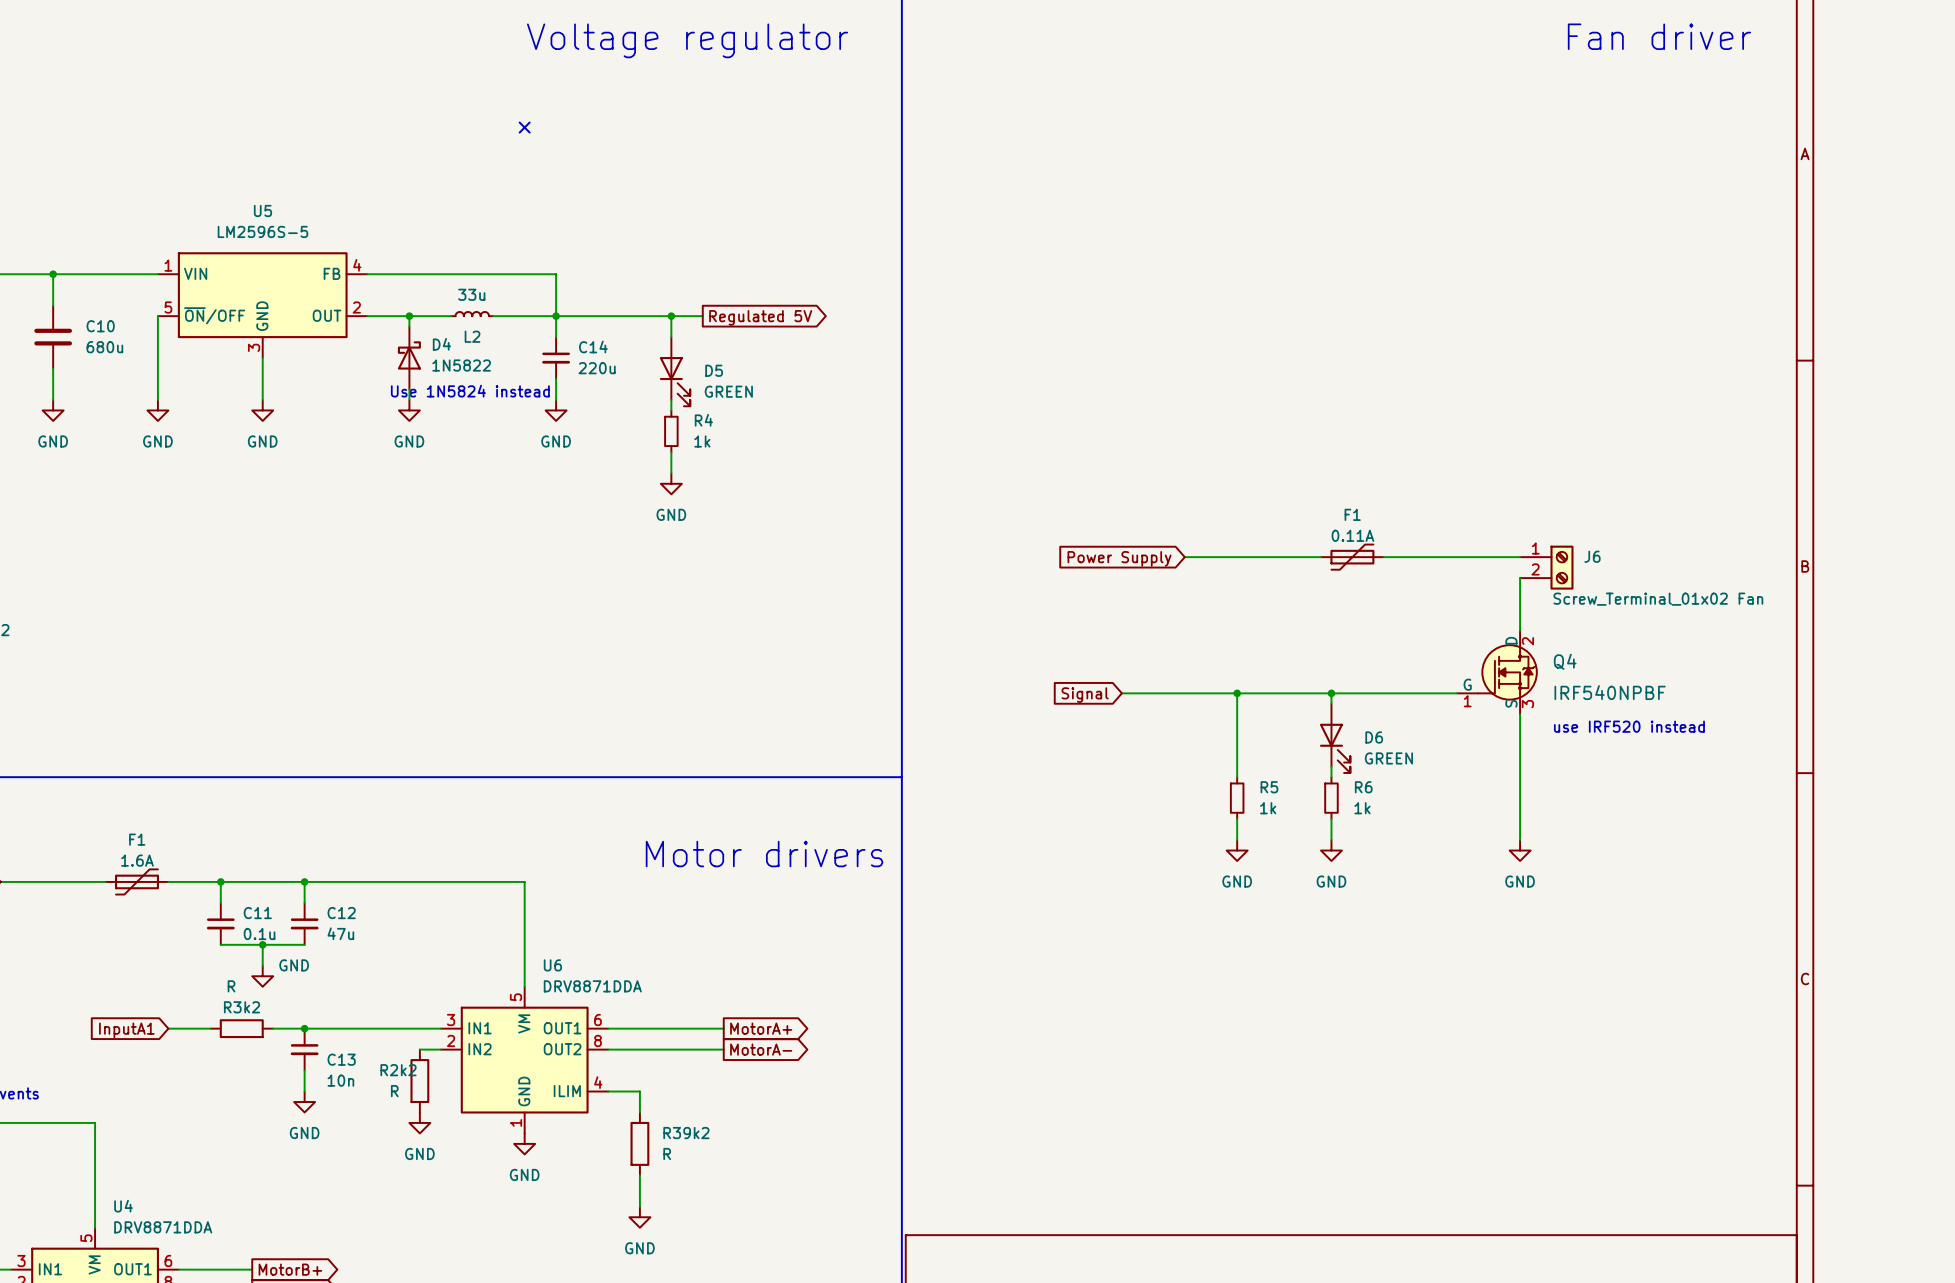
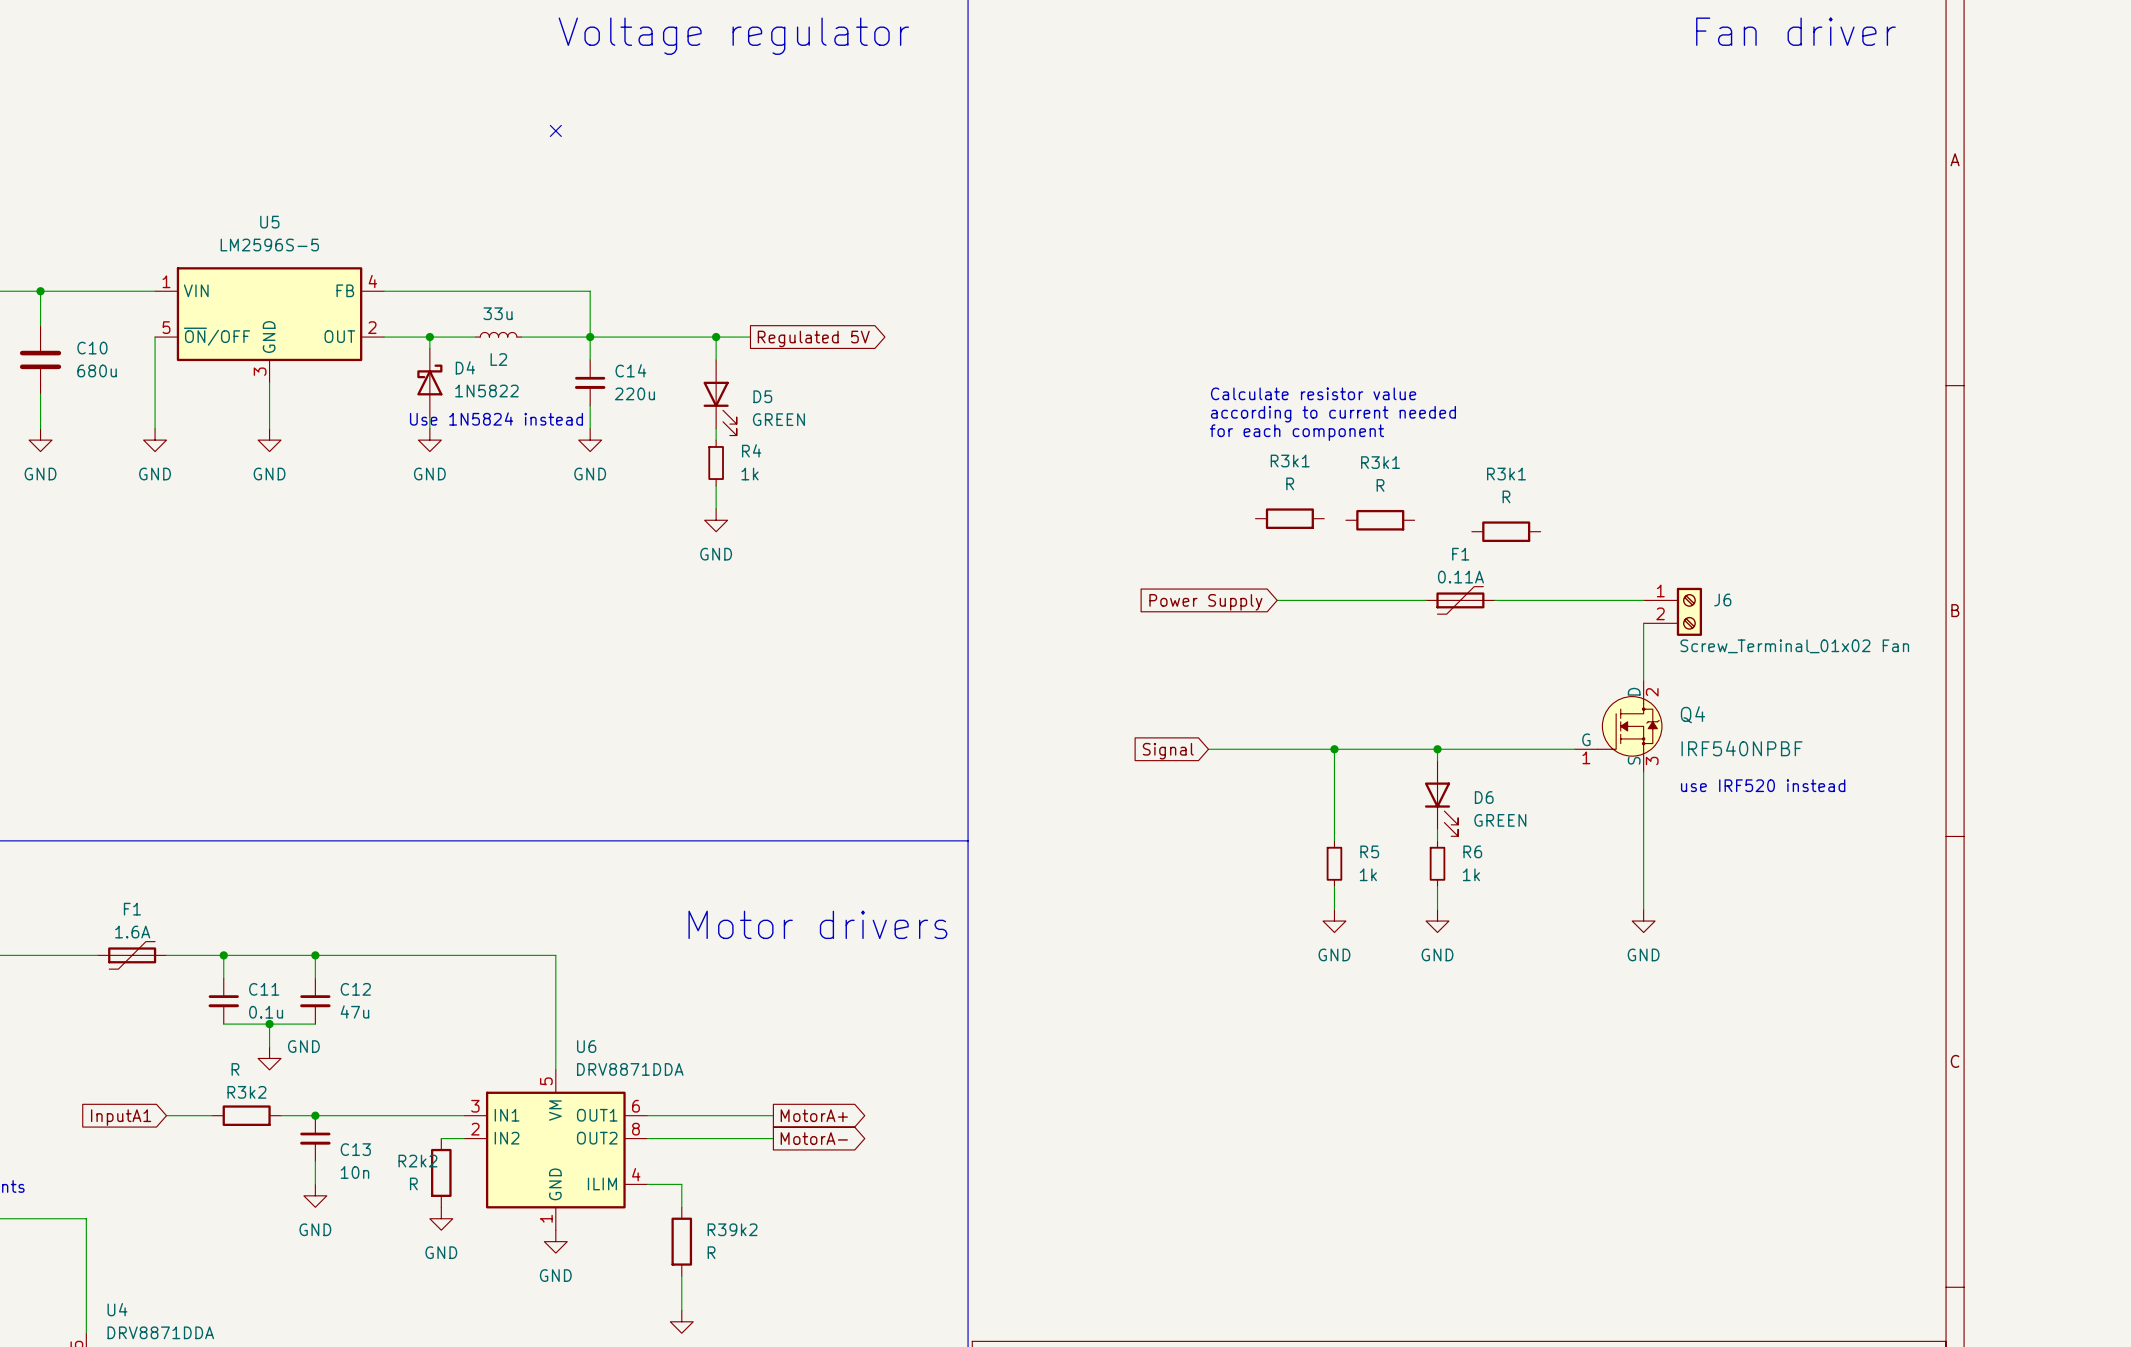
text: none -> Calculate resistor value (1313, 393)
text: none -> according to current needed (1333, 414)
text: none -> for each component (1296, 432)
R3k1: none -> R (1289, 518)
R3k1: none -> R (1380, 520)
R3k1: none -> R (1506, 531)

